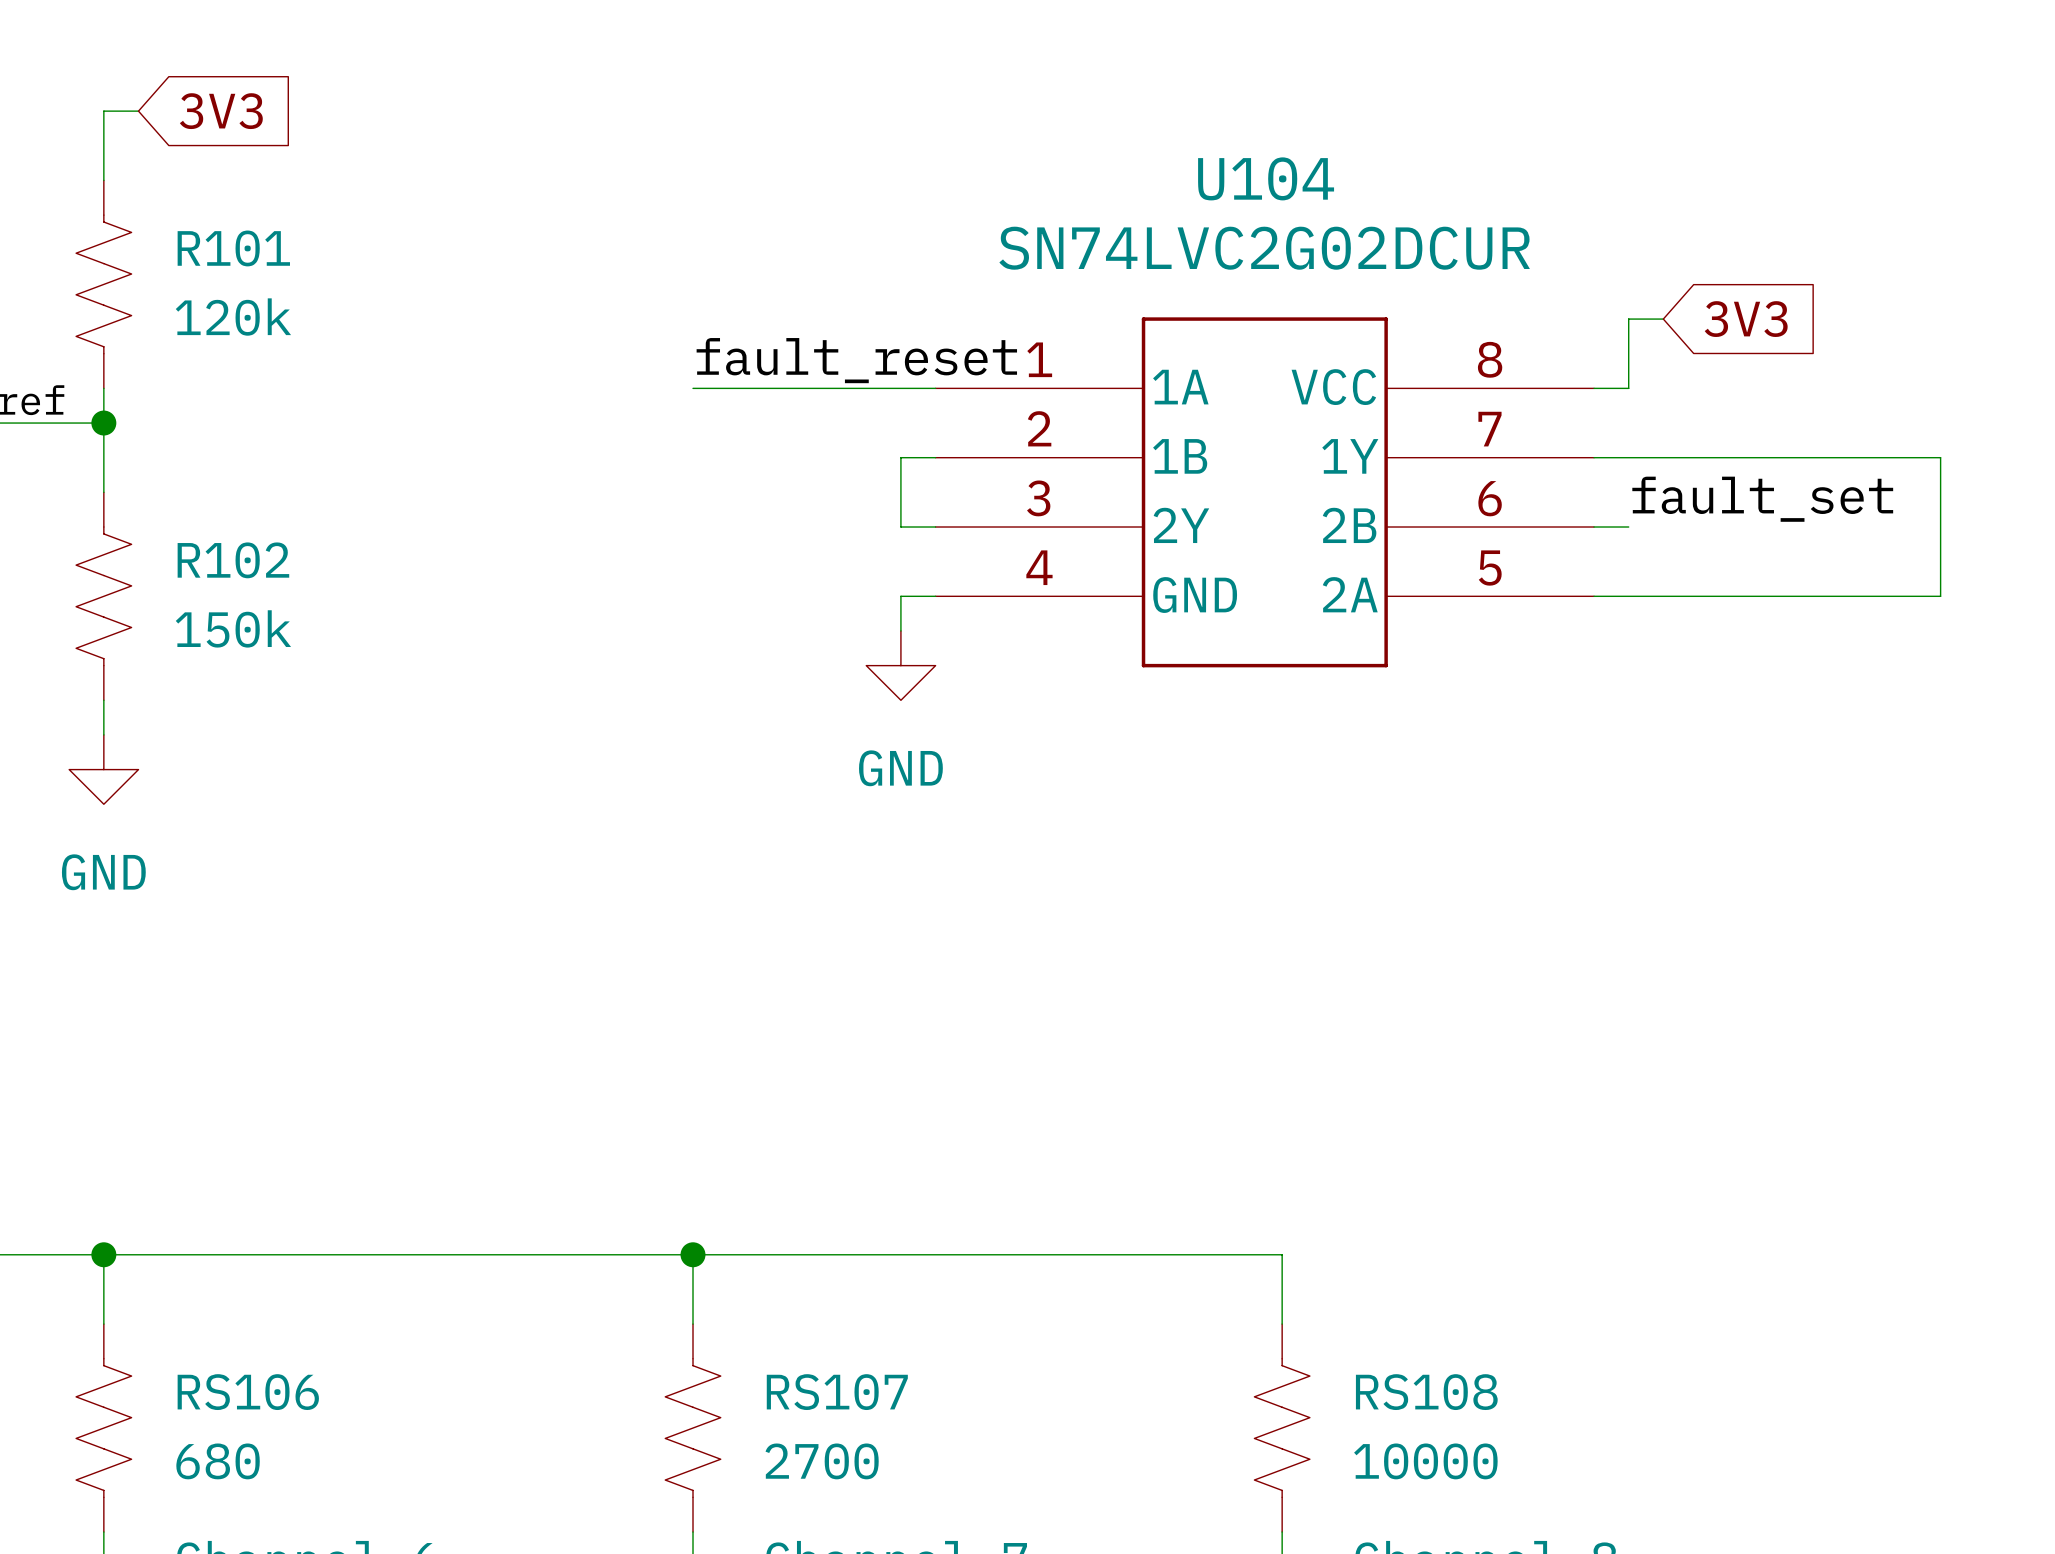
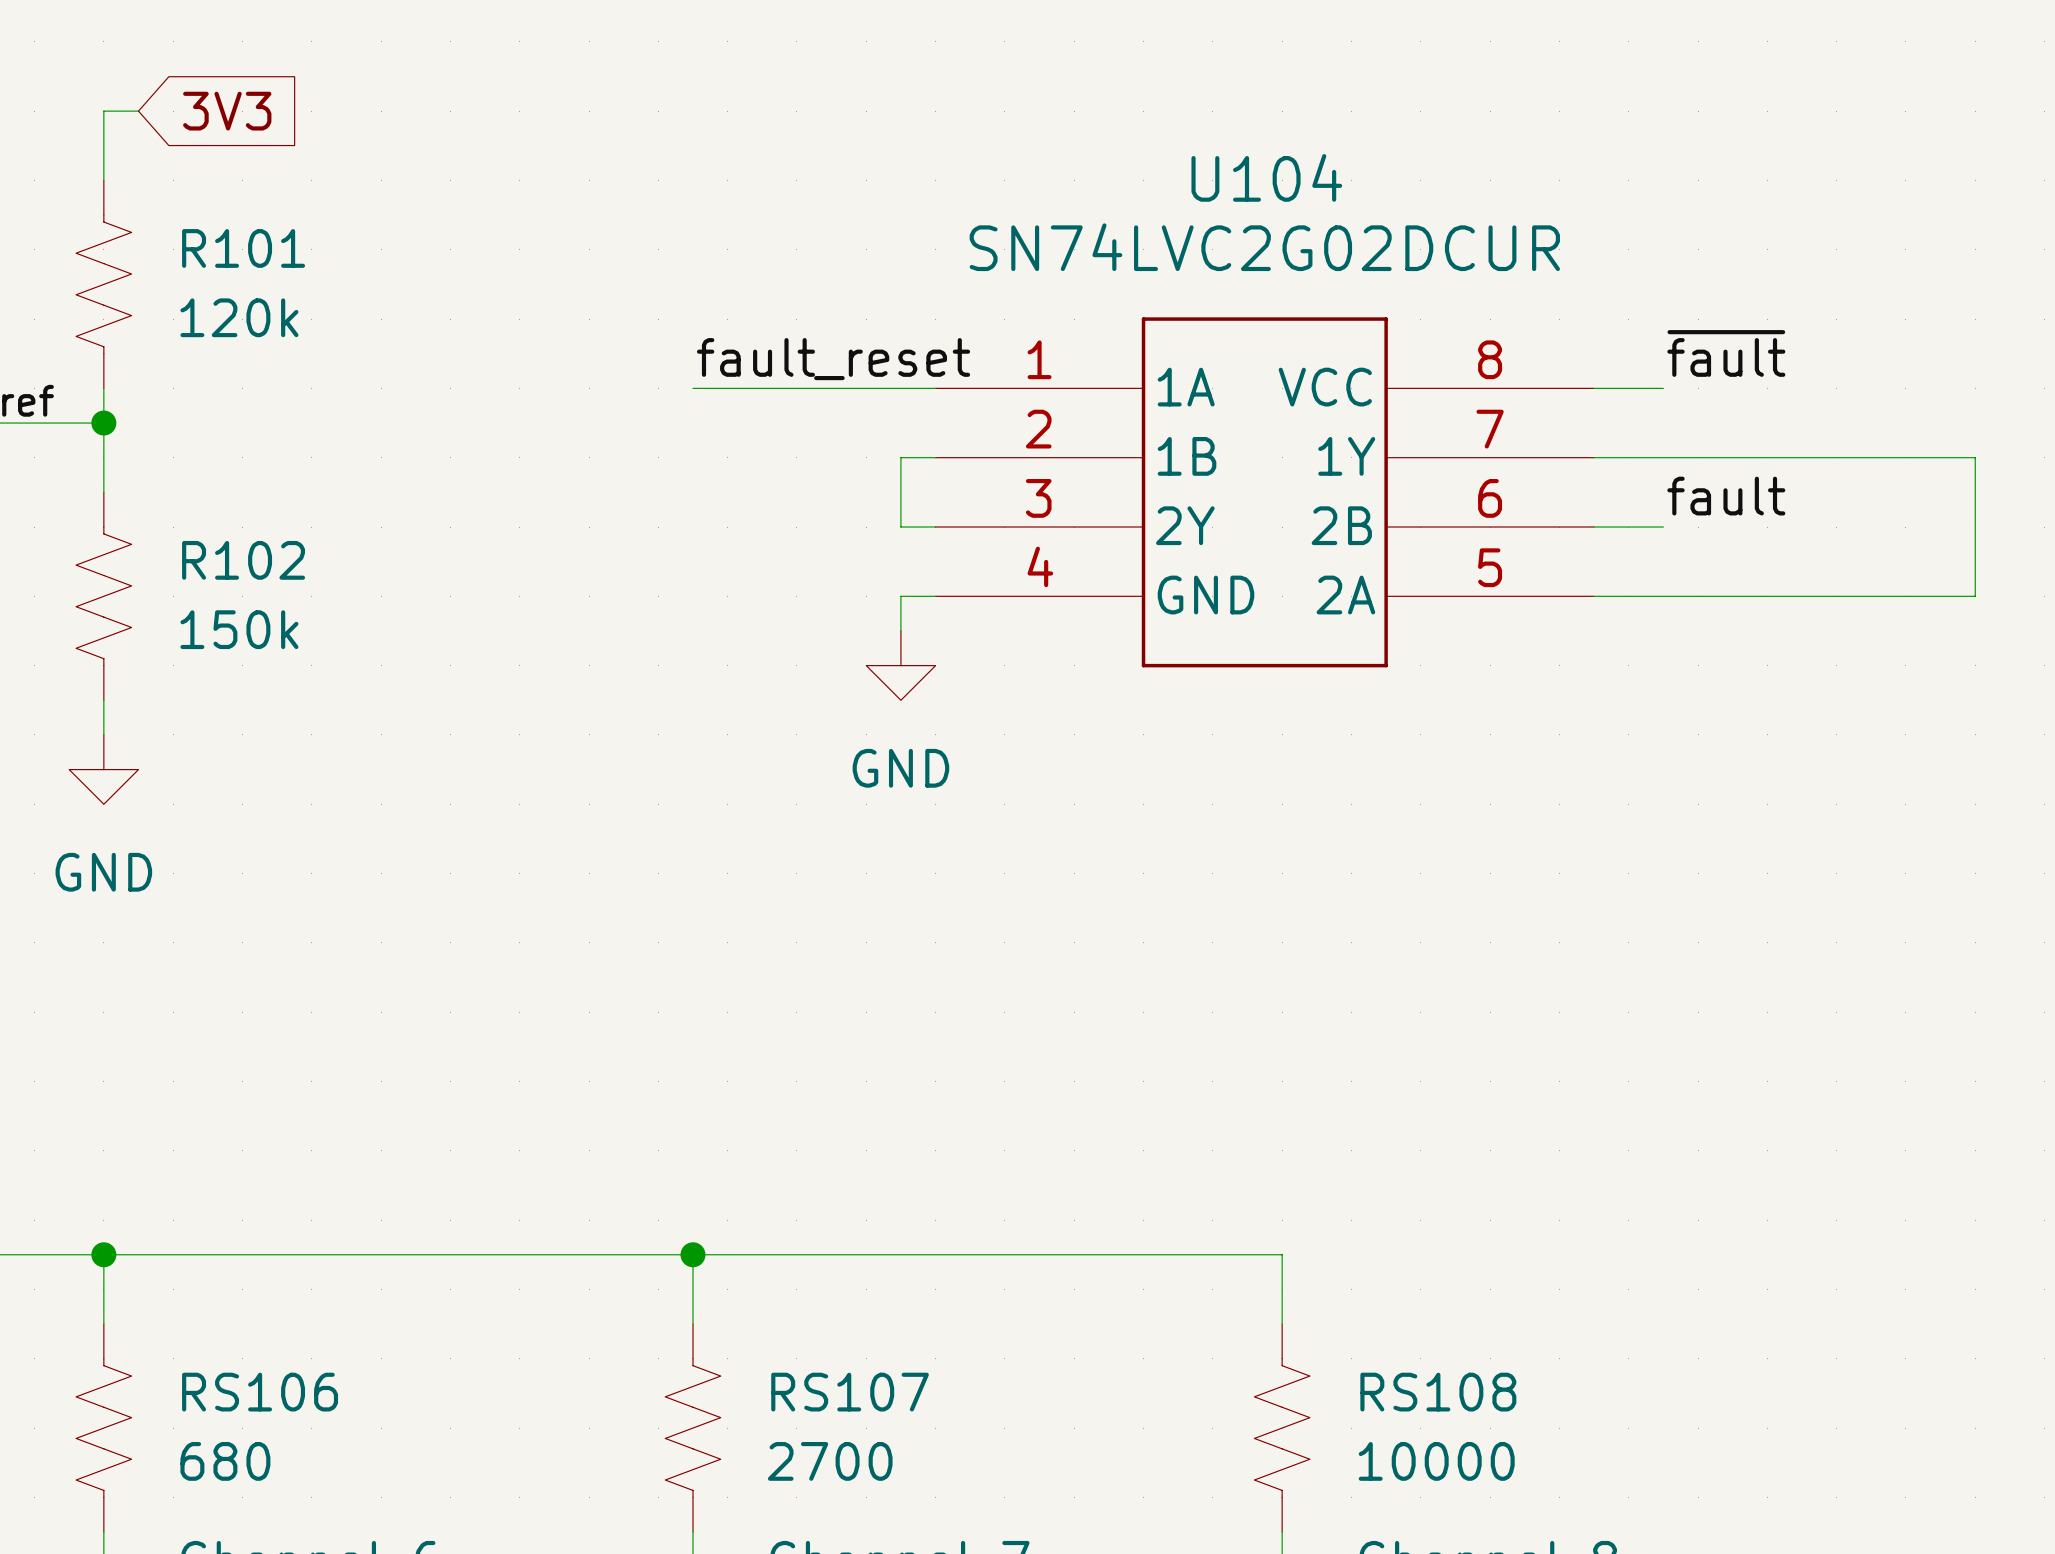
wire: (1663, 319) (1628, 319) (1628, 388) -> (1663, 388) (1628, 388)
global label: 3V3 (1746, 319) -> none
label: none -> ~{fault} (1726, 353)
wire: (1940, 457) (1940, 596) -> (1940, 457) (1975, 457) (1975, 596) (1940, 596)
label: fault_set (1762, 499) -> fault (1726, 496)
wire: none -> (1628, 527) (1663, 527)

